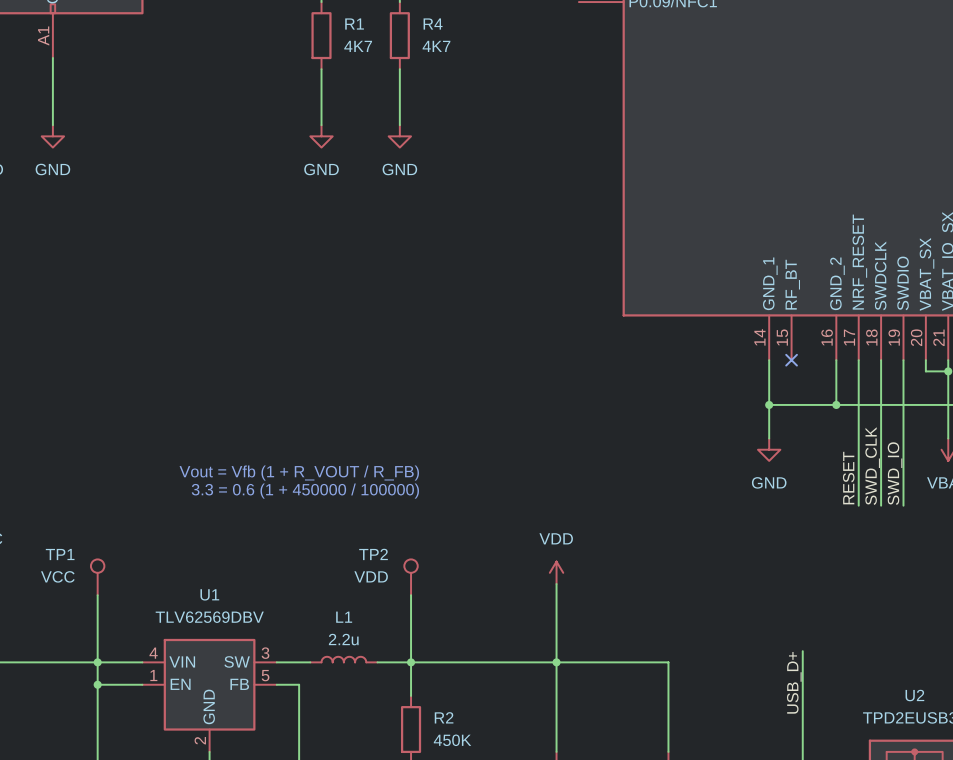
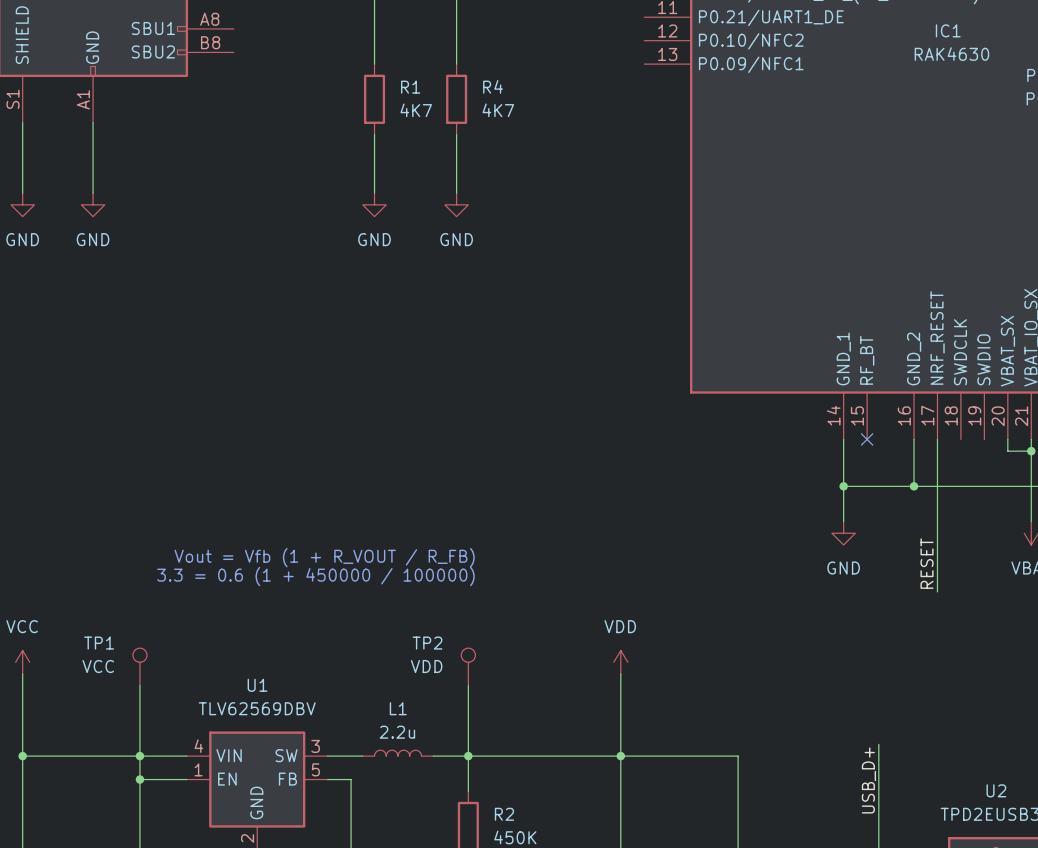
wire: (881, 360) (881, 505) -> none
wire: (903, 360) (903, 505) -> none
label: SWD_CLK (872, 466) -> none
label: SWD_IO (895, 473) -> none

